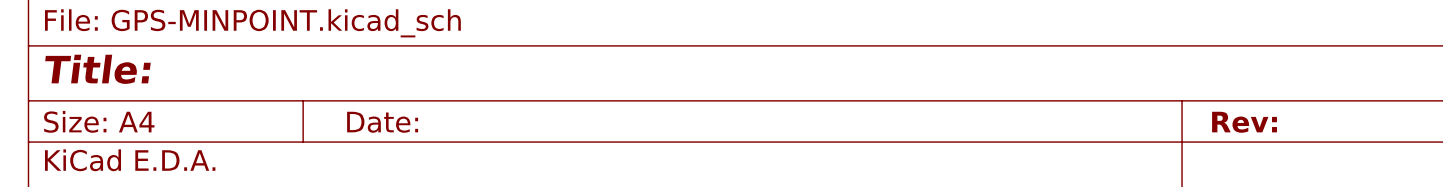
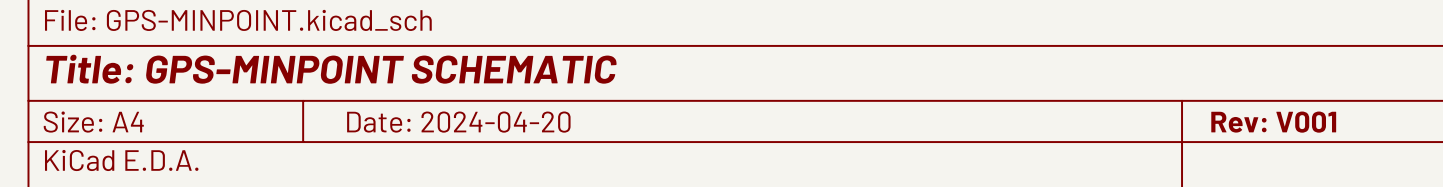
title block: Title: (97, 69) -> Title: GPS-MINPOINT SCHEMATIC (331, 69)
title block: Date: (382, 122) -> Date: 2024-04-20 (458, 122)
title block: Rev: (1244, 122) -> Rev: V001 (1273, 122)

